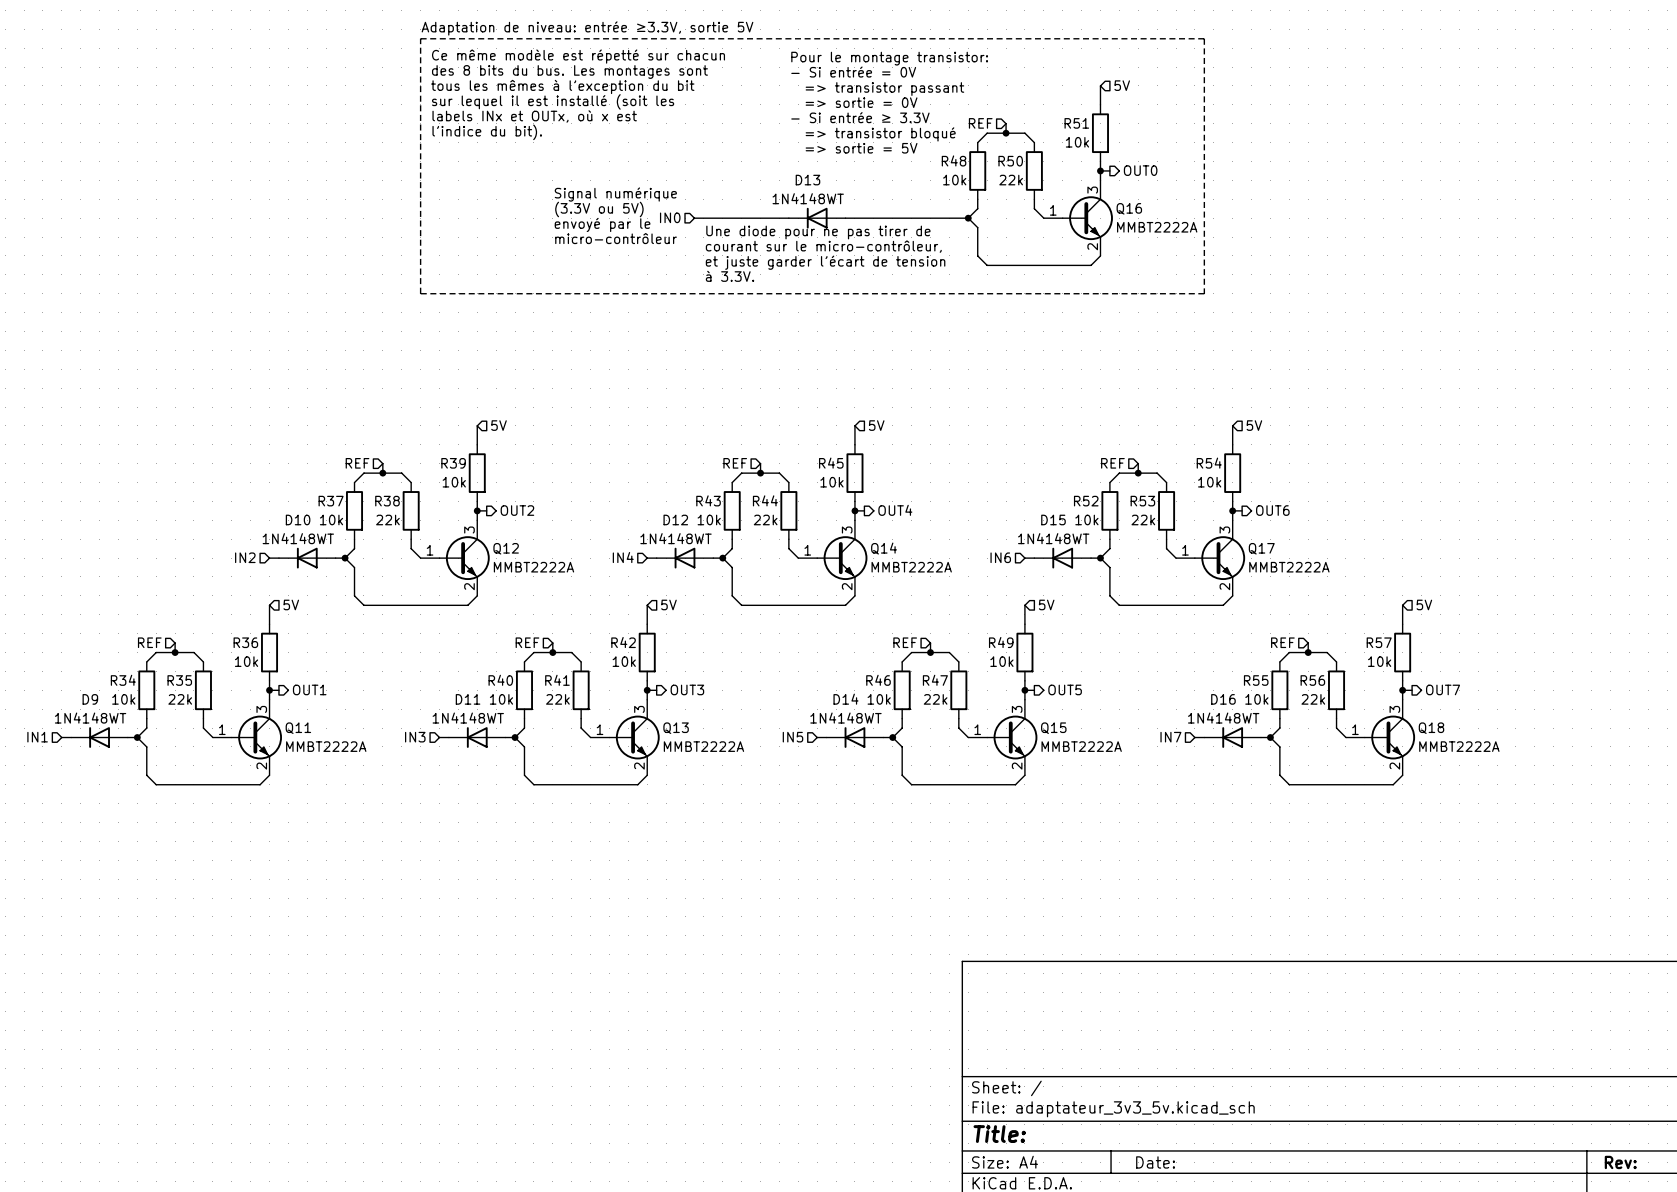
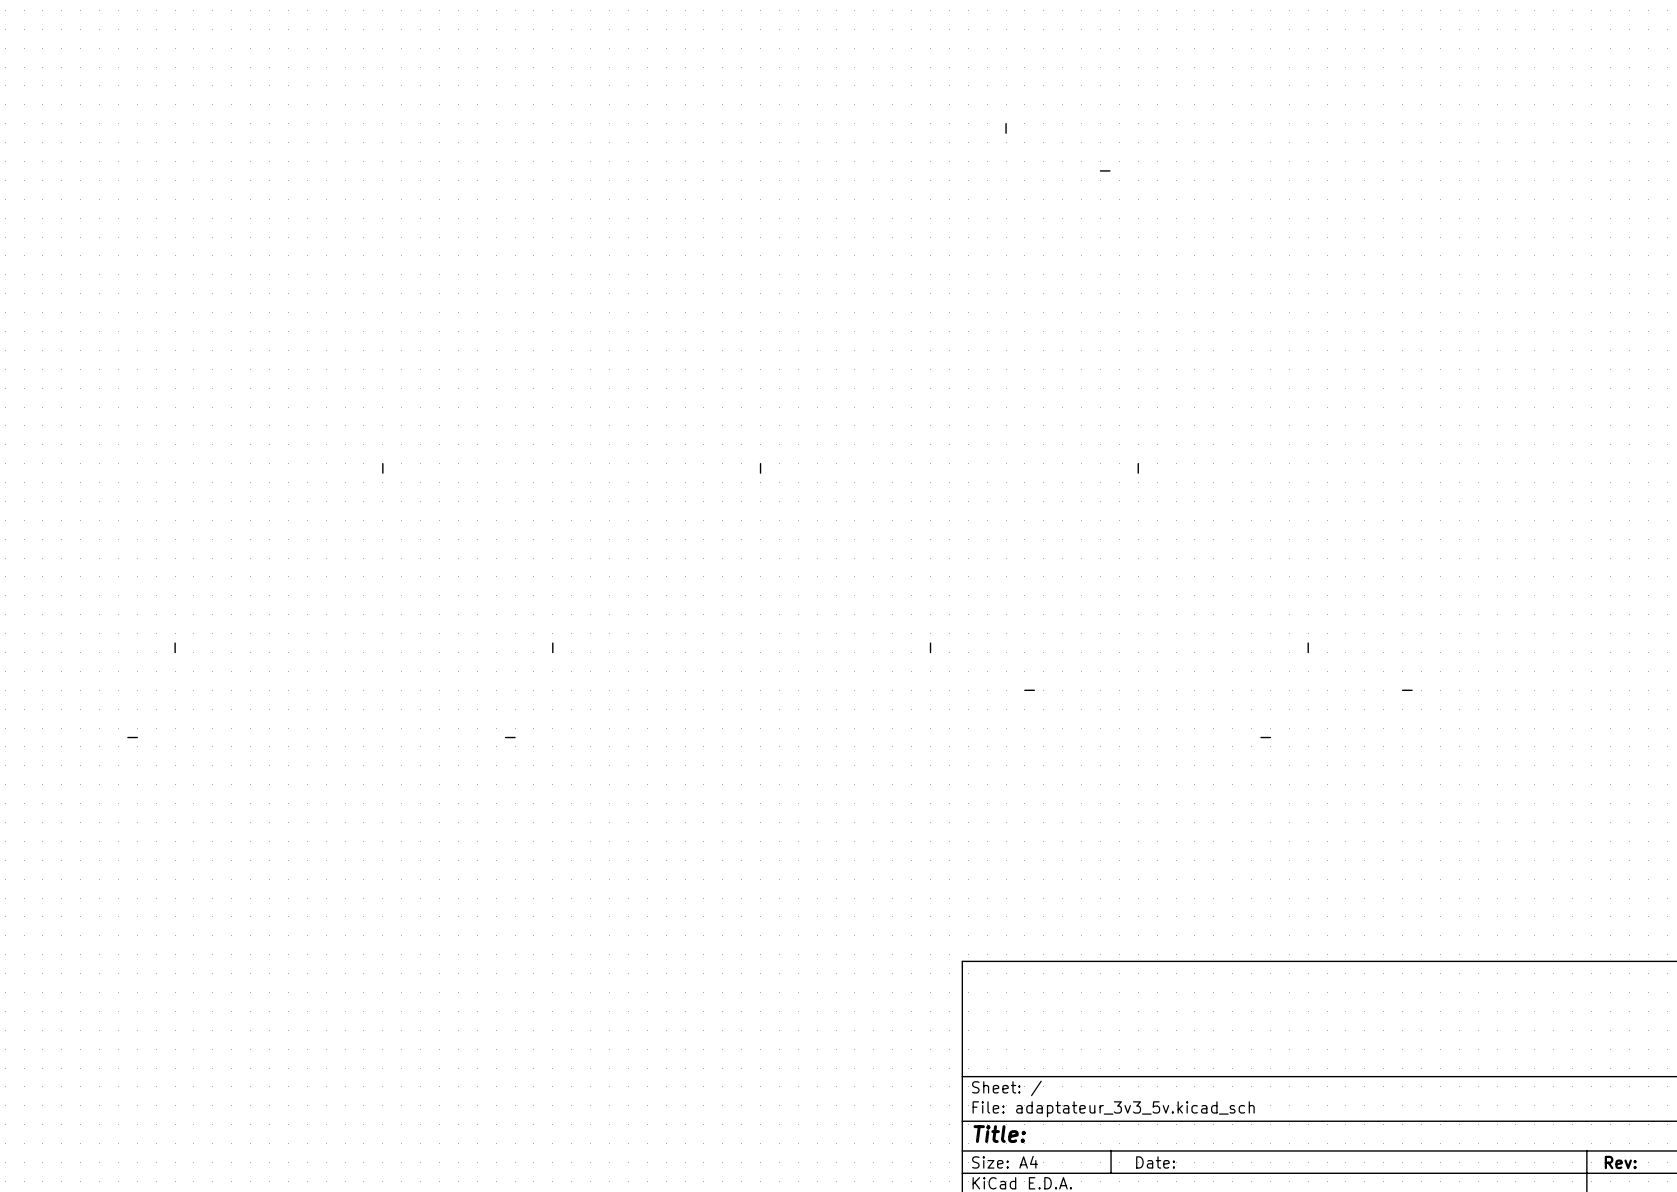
text: Adaptation de niveau: entrée ≥3.3V, sortie 5V (587, 28) -> none
line: (420, 38) (1204, 38) (1204, 293) (420, 293) (420, 38) -> none
text: Ce même modèle est répetté sur chacun (578, 56) -> none
text: Pour le montage transistor: (889, 58) -> none
text: des 8 bits du bus. Les montages sont (569, 71) -> none
text: - Si entrée = 0V (853, 72) -> none
wire: (1100, 85) (1100, 104) -> none
hierarchical label: 5V (1122, 85) -> none
text: tous les mêmes à l’exception du bit (562, 86) -> none
text: => transistor passant (884, 89) -> none
text: sur lequel il est installé (soit les (553, 101) -> none
text: => sortie = 0V (861, 102) -> none
text: labels INx et OUTx, où x est (534, 116) -> none
text: - Si entrée ≥ 3.3V (860, 117) -> none
hierarchical label: REF (980, 123) -> none
text: l’indice du bit). (487, 132) -> none
junction: (1006, 133) -> none
R51: 10k (1100, 133) -> none
text: => transistor bloqué (880, 134) -> none
wire: (977, 142) (987, 133) (1024, 133) (1034, 142) -> none
text: => sortie = 5V (861, 148) -> none
wire: (1100, 161) (1100, 180) -> none
R48: 10k (977, 170) -> none
R50: 22k (1034, 170) -> none
junction: (1100, 170) -> none
hierarchical label: OUT0 (1140, 170) -> none
text: Signal numérique (615, 194) -> none
wire: (977, 199) (977, 208) (968, 218) -> none
wire: (1034, 199) (1034, 208) (1043, 218) -> none
text: (3.3V ou 5V) (599, 209) -> none
hierarchical label: IN0 (670, 217) -> none
wire: (694, 218) (788, 218) -> none
D13: 1N4148WT (817, 218) -> none
wire: (845, 218) (968, 218) -> none
wire: (968, 218) (977, 227) (977, 255) (987, 265) (1091, 265) (1100, 255) -> none
junction: (968, 218) -> none
Q16: MMBT2222A (1078, 218) -> none
text: envoyé par le (602, 224) -> none
text: Une diode pour ne pas tirer de (818, 232) -> none
text: micro-contrôleur (616, 238) -> none
text: courant sur le micro-contrôleur, (823, 246) -> none
text: et juste garder l’écart de tension (825, 262) -> none
text: à 3.3V. (730, 276) -> none
wire: (477, 425) (477, 444) -> none
hierarchical label: 5V (498, 425) -> none
wire: (854, 425) (854, 444) -> none
hierarchical label: 5V (876, 425) -> none
wire: (1232, 425) (1232, 444) -> none
hierarchical label: 5V (1254, 425) -> none
hierarchical label: REF (357, 463) -> none
hierarchical label: REF (735, 463) -> none
hierarchical label: REF (1112, 463) -> none
junction: (382, 473) -> none
R39: 10k (477, 473) -> none
junction: (760, 473) -> none
R45: 10k (854, 473) -> none
junction: (1138, 473) -> none
R54: 10k (1232, 473) -> none
wire: (354, 482) (363, 473) (401, 473) (411, 482) -> none
wire: (732, 482) (741, 473) (779, 473) (788, 482) -> none
wire: (1109, 482) (1119, 473) (1157, 473) (1166, 482) -> none
wire: (477, 501) (477, 520) -> none
wire: (854, 501) (854, 520) -> none
wire: (1232, 501) (1232, 520) -> none
R37: 10k (354, 510) -> none
R38: 22k (411, 510) -> none
wire: (477, 510) (486, 510) -> none
junction: (477, 510) -> none
hierarchical label: OUT2 (517, 510) -> none
R43: 10k (732, 510) -> none
R44: 22k (788, 510) -> none
wire: (854, 510) (864, 510) -> none
junction: (854, 510) -> none
hierarchical label: OUT4 (895, 510) -> none
R52: 10k (1109, 510) -> none
R53: 22k (1166, 510) -> none
wire: (1232, 510) (1242, 510) -> none
junction: (1232, 510) -> none
hierarchical label: OUT6 (1272, 510) -> none
wire: (354, 539) (354, 548) (345, 558) -> none
wire: (411, 539) (411, 548) (420, 558) -> none
wire: (732, 539) (732, 548) (722, 558) -> none
wire: (788, 539) (788, 548) (798, 558) -> none
wire: (1109, 539) (1109, 548) (1100, 558) -> none
wire: (1166, 539) (1166, 548) (1176, 558) -> none
hierarchical label: IN2 (245, 557) -> none
hierarchical label: IN4 (623, 557) -> none
hierarchical label: IN6 (1000, 557) -> none
wire: (269, 558) (278, 558) -> none
D10: 1N4148WT (307, 558) -> none
wire: (335, 558) (345, 558) -> none
wire: (345, 558) (354, 567) (354, 595) (363, 605) (467, 605) (477, 595) -> none
junction: (345, 558) -> none
Q12: MMBT2222A (455, 558) -> none
wire: (647, 558) (656, 558) -> none
D12: 1N4148WT (685, 558) -> none
wire: (713, 558) (722, 558) -> none
wire: (722, 558) (732, 567) (732, 595) (741, 605) (845, 605) (854, 595) -> none
junction: (722, 558) -> none
Q14: MMBT2222A (832, 558) -> none
wire: (1024, 558) (1034, 558) -> none
D15: 1N4148WT (1062, 558) -> none
wire: (1091, 558) (1100, 558) -> none
wire: (1100, 558) (1109, 567) (1109, 595) (1119, 605) (1223, 605) (1232, 595) -> none
junction: (1100, 558) -> none
Q17: MMBT2222A (1210, 558) -> none
hierarchical label: 5V (291, 604) -> none
hierarchical label: 5V (668, 604) -> none
hierarchical label: 5V (1046, 604) -> none
hierarchical label: 5V (1424, 604) -> none
wire: (269, 605) (269, 624) -> none
wire: (647, 605) (647, 624) -> none
wire: (1024, 605) (1024, 624) -> none
wire: (1402, 605) (1402, 624) -> none
hierarchical label: REF (149, 642) -> none
hierarchical label: REF (527, 642) -> none
hierarchical label: REF (905, 642) -> none
hierarchical label: REF (1282, 642) -> none
junction: (175, 652) -> none
R36: 10k (269, 652) -> none
junction: (552, 652) -> none
R42: 10k (647, 652) -> none
junction: (930, 652) -> none
R49: 10k (1024, 652) -> none
junction: (1308, 652) -> none
R57: 10k (1402, 652) -> none
wire: (146, 661) (156, 652) (193, 652) (203, 661) -> none
wire: (524, 661) (533, 652) (571, 652) (581, 661) -> none
wire: (902, 661) (911, 652) (949, 652) (958, 661) -> none
wire: (1279, 661) (1289, 652) (1327, 652) (1336, 661) -> none
wire: (269, 680) (269, 699) -> none
wire: (647, 680) (647, 699) -> none
wire: (1024, 680) (1024, 699) -> none
wire: (1402, 680) (1402, 699) -> none
hierarchical label: OUT1 (309, 689) -> none
hierarchical label: OUT3 (687, 689) -> none
hierarchical label: OUT5 (1065, 689) -> none
hierarchical label: OUT7 (1443, 689) -> none
R34: 10k (146, 690) -> none
R35: 22k (203, 690) -> none
wire: (269, 690) (278, 690) -> none
junction: (269, 690) -> none
R40: 10k (524, 690) -> none
R41: 22k (581, 690) -> none
wire: (647, 690) (656, 690) -> none
junction: (647, 690) -> none
R46: 10k (902, 690) -> none
R47: 22k (958, 690) -> none
junction: (1024, 690) -> none
R55: 10k (1279, 690) -> none
R56: 22k (1336, 690) -> none
junction: (1402, 690) -> none
wire: (146, 718) (146, 728) (137, 737) (146, 746) (146, 775) (156, 784) (260, 784) (269, 775) -> none
wire: (203, 718) (203, 728) (212, 737) -> none
wire: (524, 718) (524, 728) (515, 737) (524, 746) (524, 775) (533, 784) (637, 784) (647, 775) -> none
wire: (581, 718) (581, 728) (590, 737) -> none
wire: (902, 718) (902, 728) (892, 737) -> none
wire: (958, 718) (958, 728) (968, 737) -> none
wire: (1279, 718) (1279, 728) (1270, 737) (1279, 746) (1279, 775) (1289, 784) (1393, 784) (1402, 775) -> none
wire: (1336, 718) (1336, 728) (1345, 737) -> none
hierarchical label: IN1 (37, 737) -> none
wire: (61, 737) (71, 737) -> none
D9: 1N4148WT (99, 737) -> none
junction: (137, 737) -> none
Q11: MMBT2222A (247, 737) -> none
hierarchical label: IN3 (415, 737) -> none
wire: (439, 737) (448, 737) -> none
D11: 1N4148WT (477, 737) -> none
junction: (515, 737) -> none
Q13: MMBT2222A (625, 737) -> none
hierarchical label: IN5 (792, 737) -> none
wire: (817, 737) (826, 737) -> none
D14: 1N4148WT (854, 737) -> none
wire: (883, 737) (892, 737) -> none
wire: (892, 737) (902, 746) (902, 775) (911, 784) (1015, 784) (1024, 775) -> none
junction: (892, 737) -> none
Q15: MMBT2222A (1002, 737) -> none
hierarchical label: IN7 (1170, 737) -> none
wire: (1194, 737) (1204, 737) -> none
D16: 1N4148WT (1232, 737) -> none
junction: (1270, 737) -> none
Q18: MMBT2222A (1380, 737) -> none

